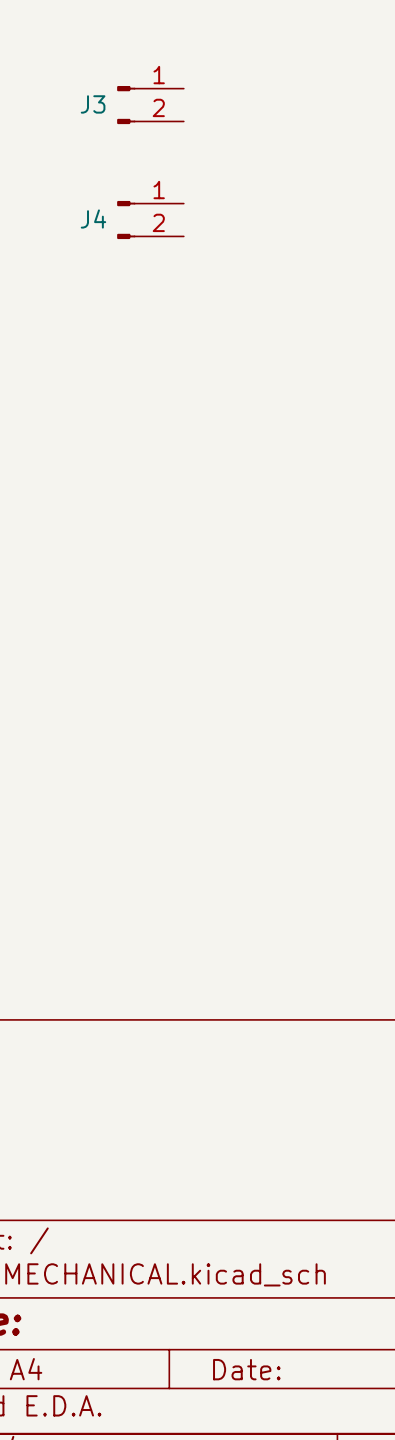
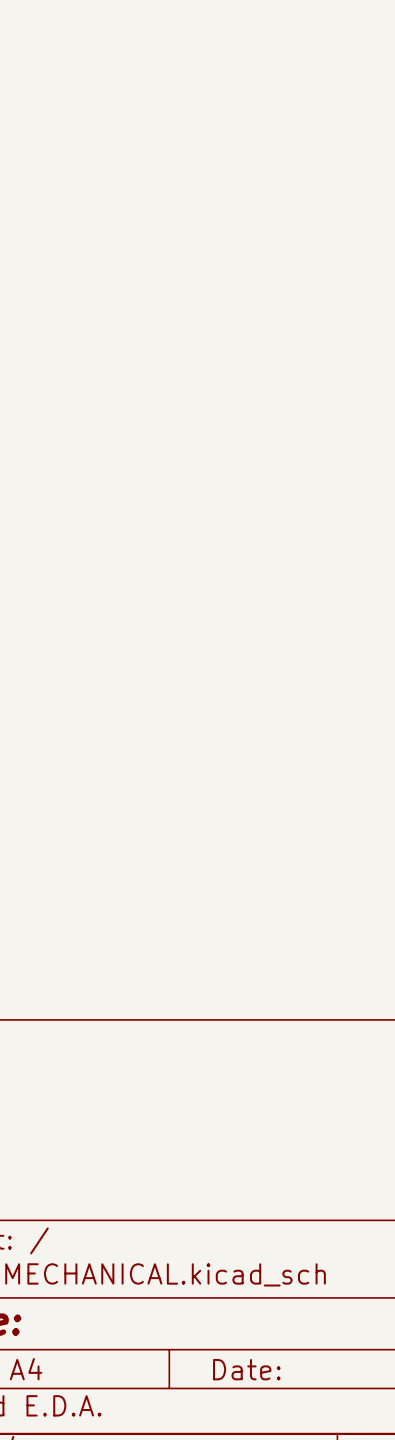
J3: (150, 105) -> none
J4: (150, 220) -> none

